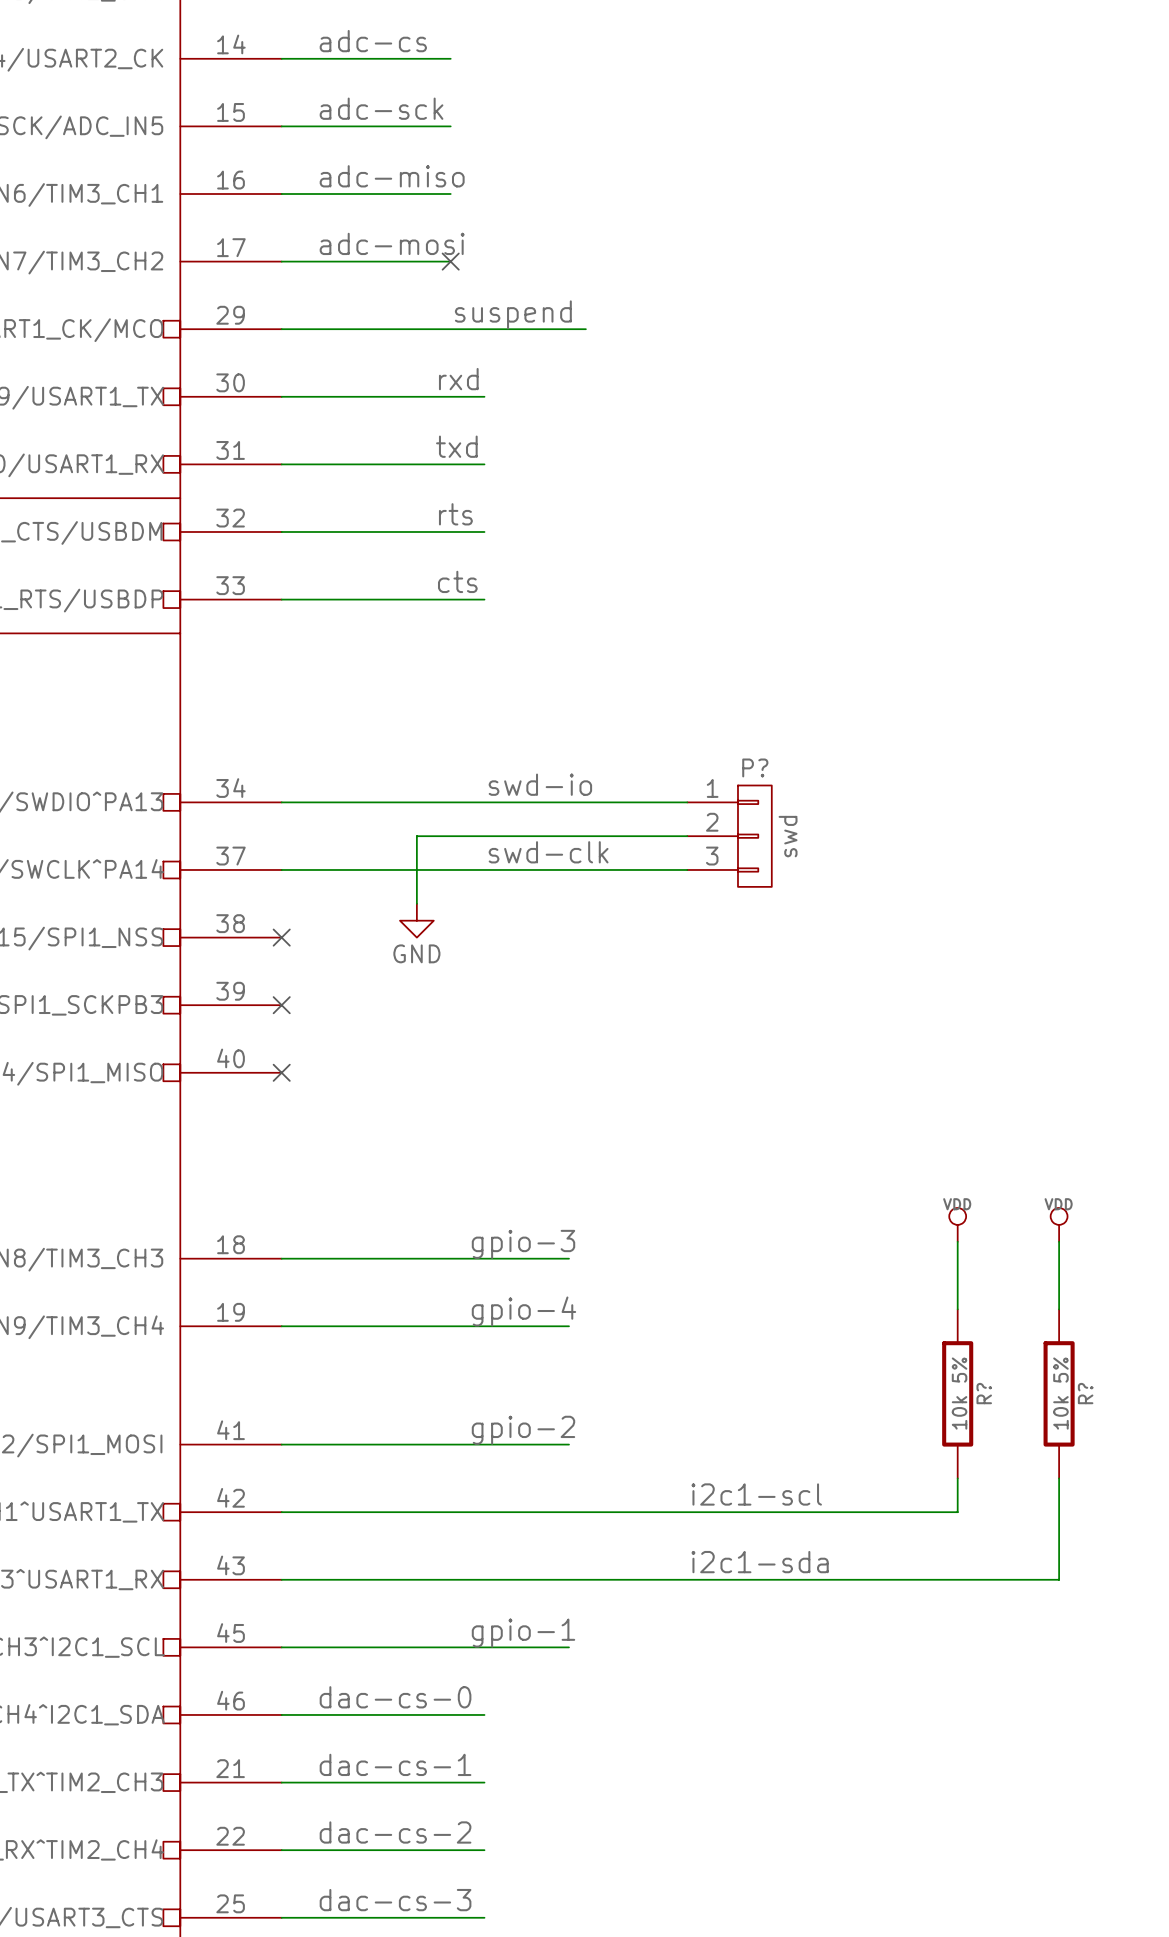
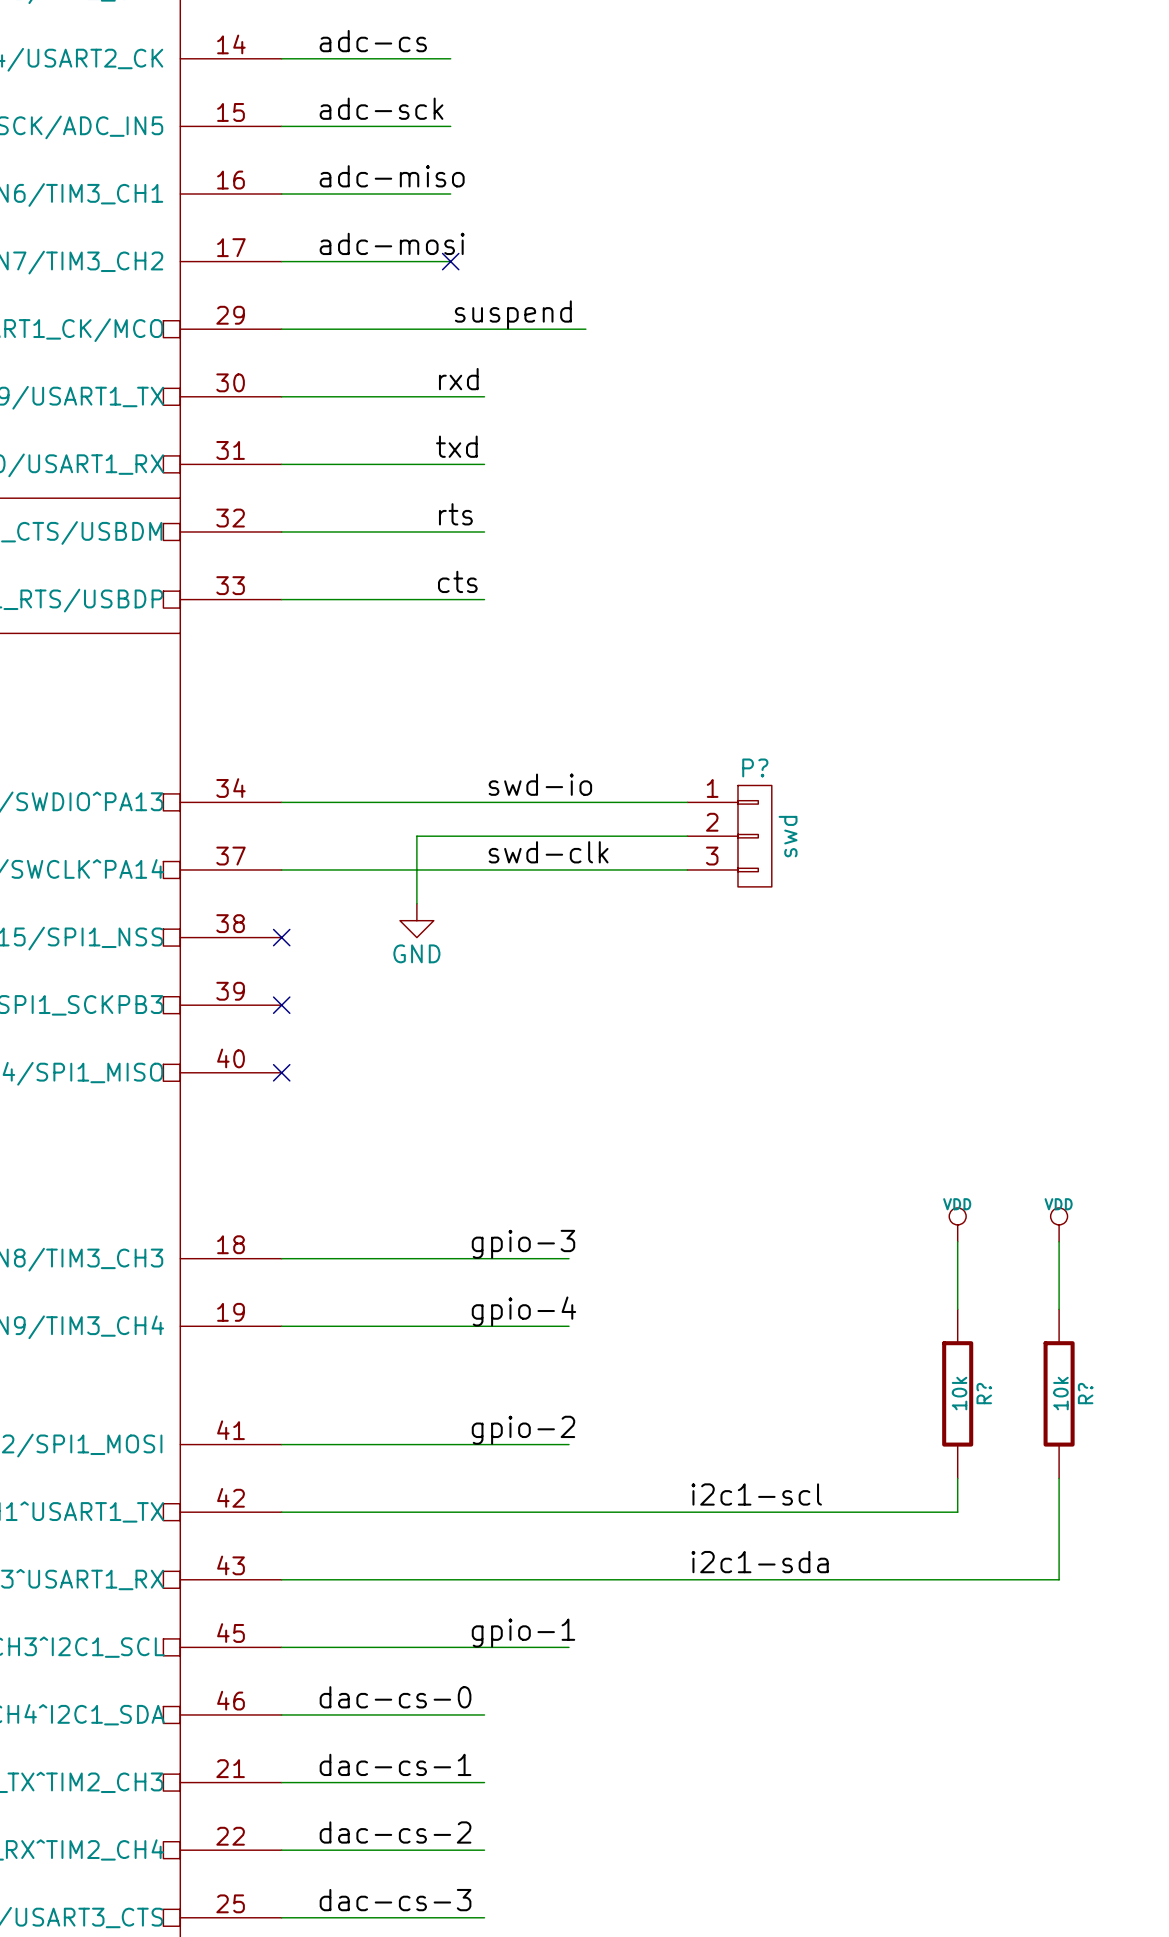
R? value: 10k 5% (959, 1393) -> 10k (959, 1393)
R? value: 10k 5% (1060, 1393) -> 10k (1060, 1393)

